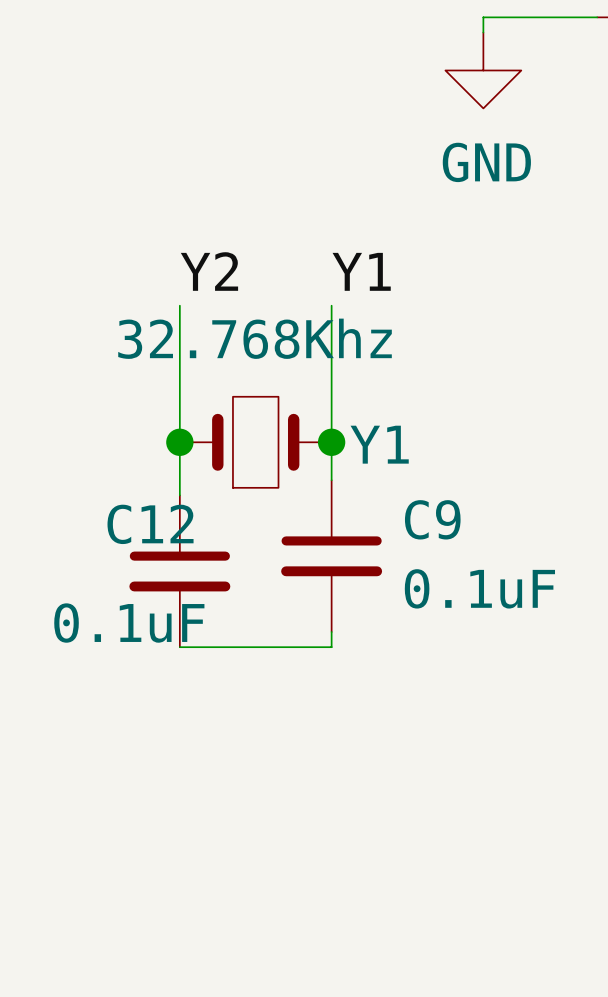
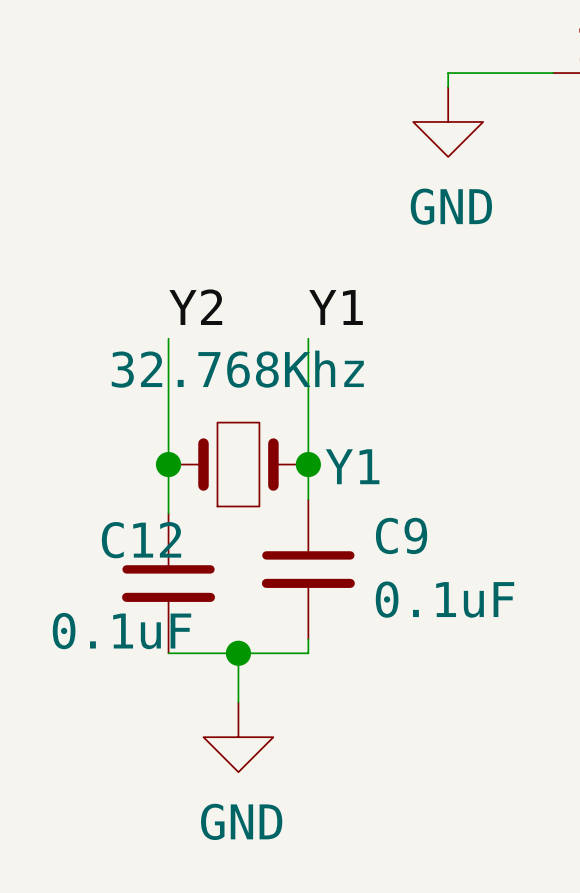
wire: none -> (238, 653) (238, 702)
junction: none -> (238, 653)
power symbol: none -> GND (238, 737)

